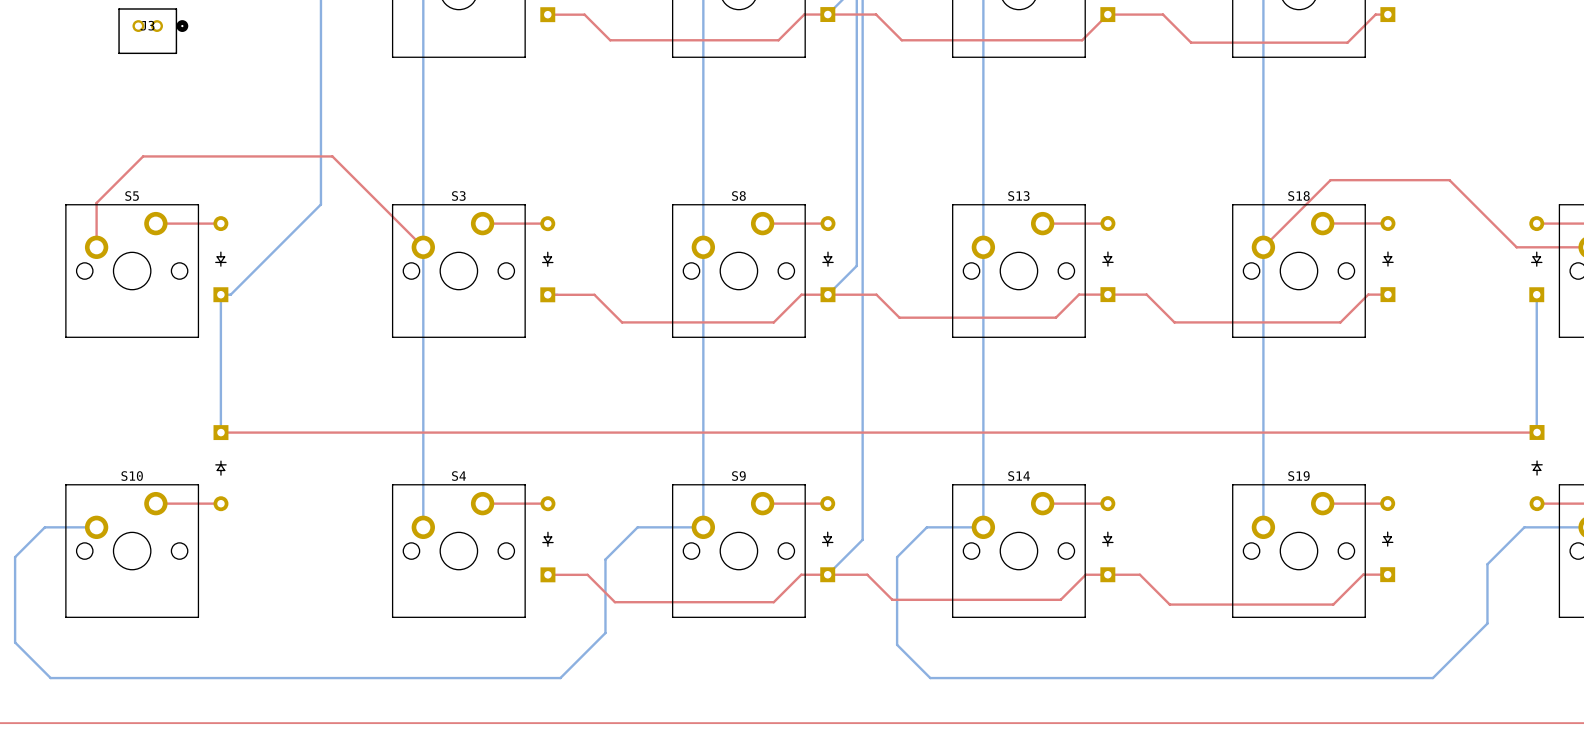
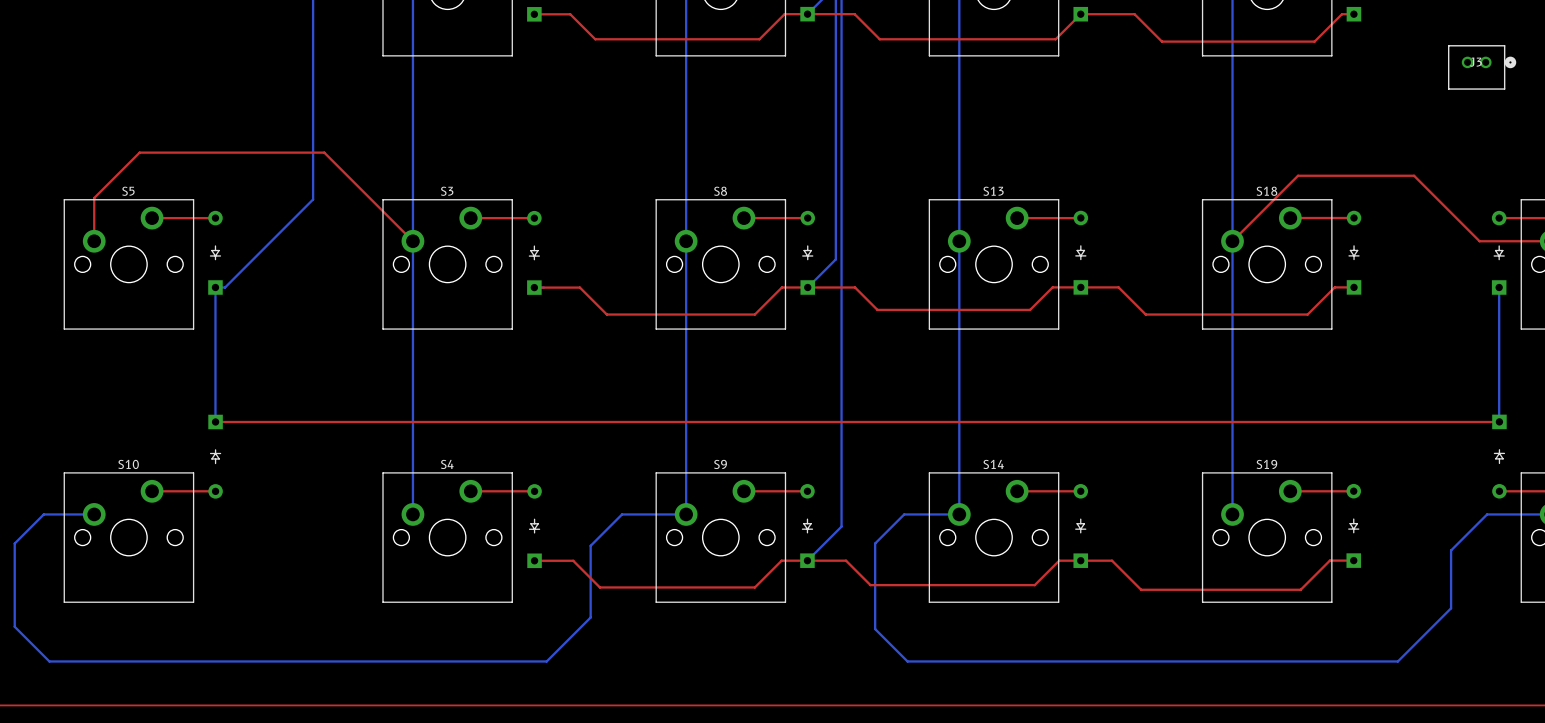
J3 position: (153, 31) -> (1482, 67)

